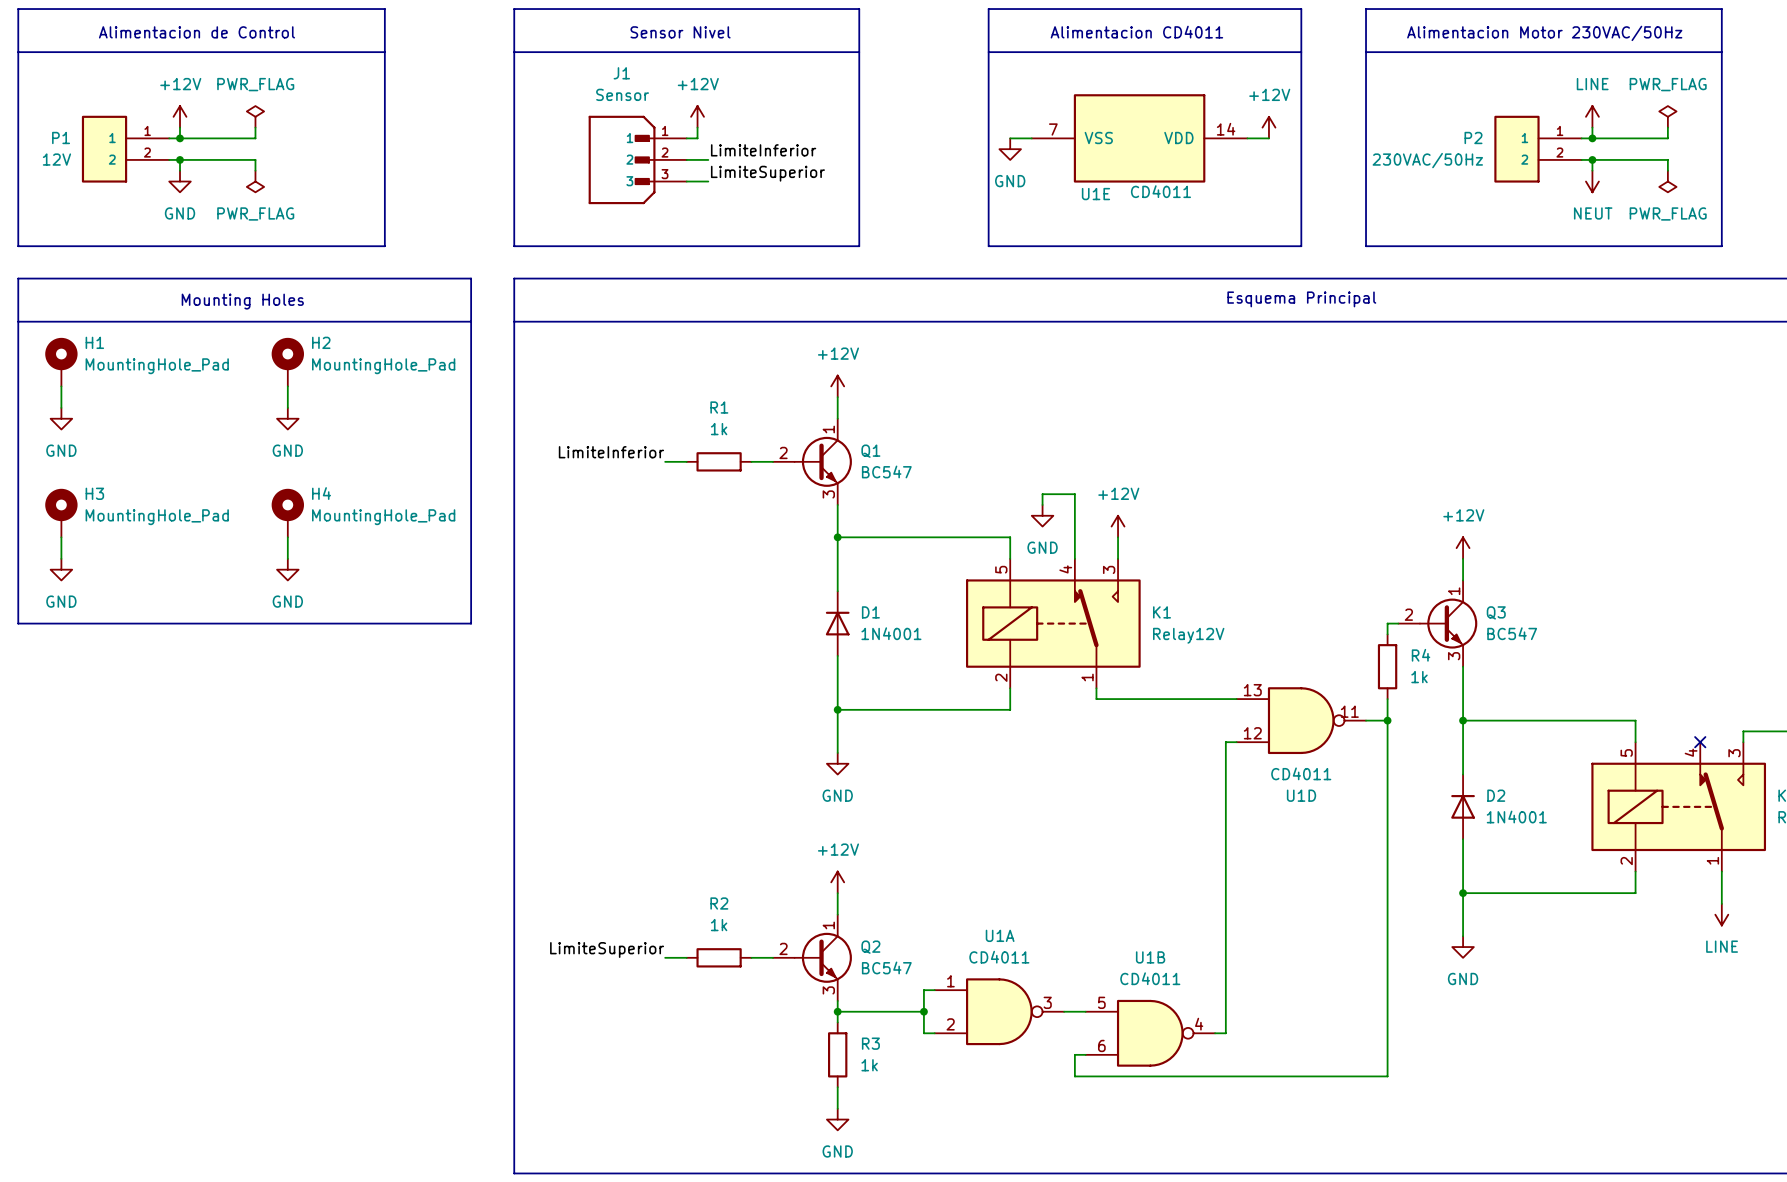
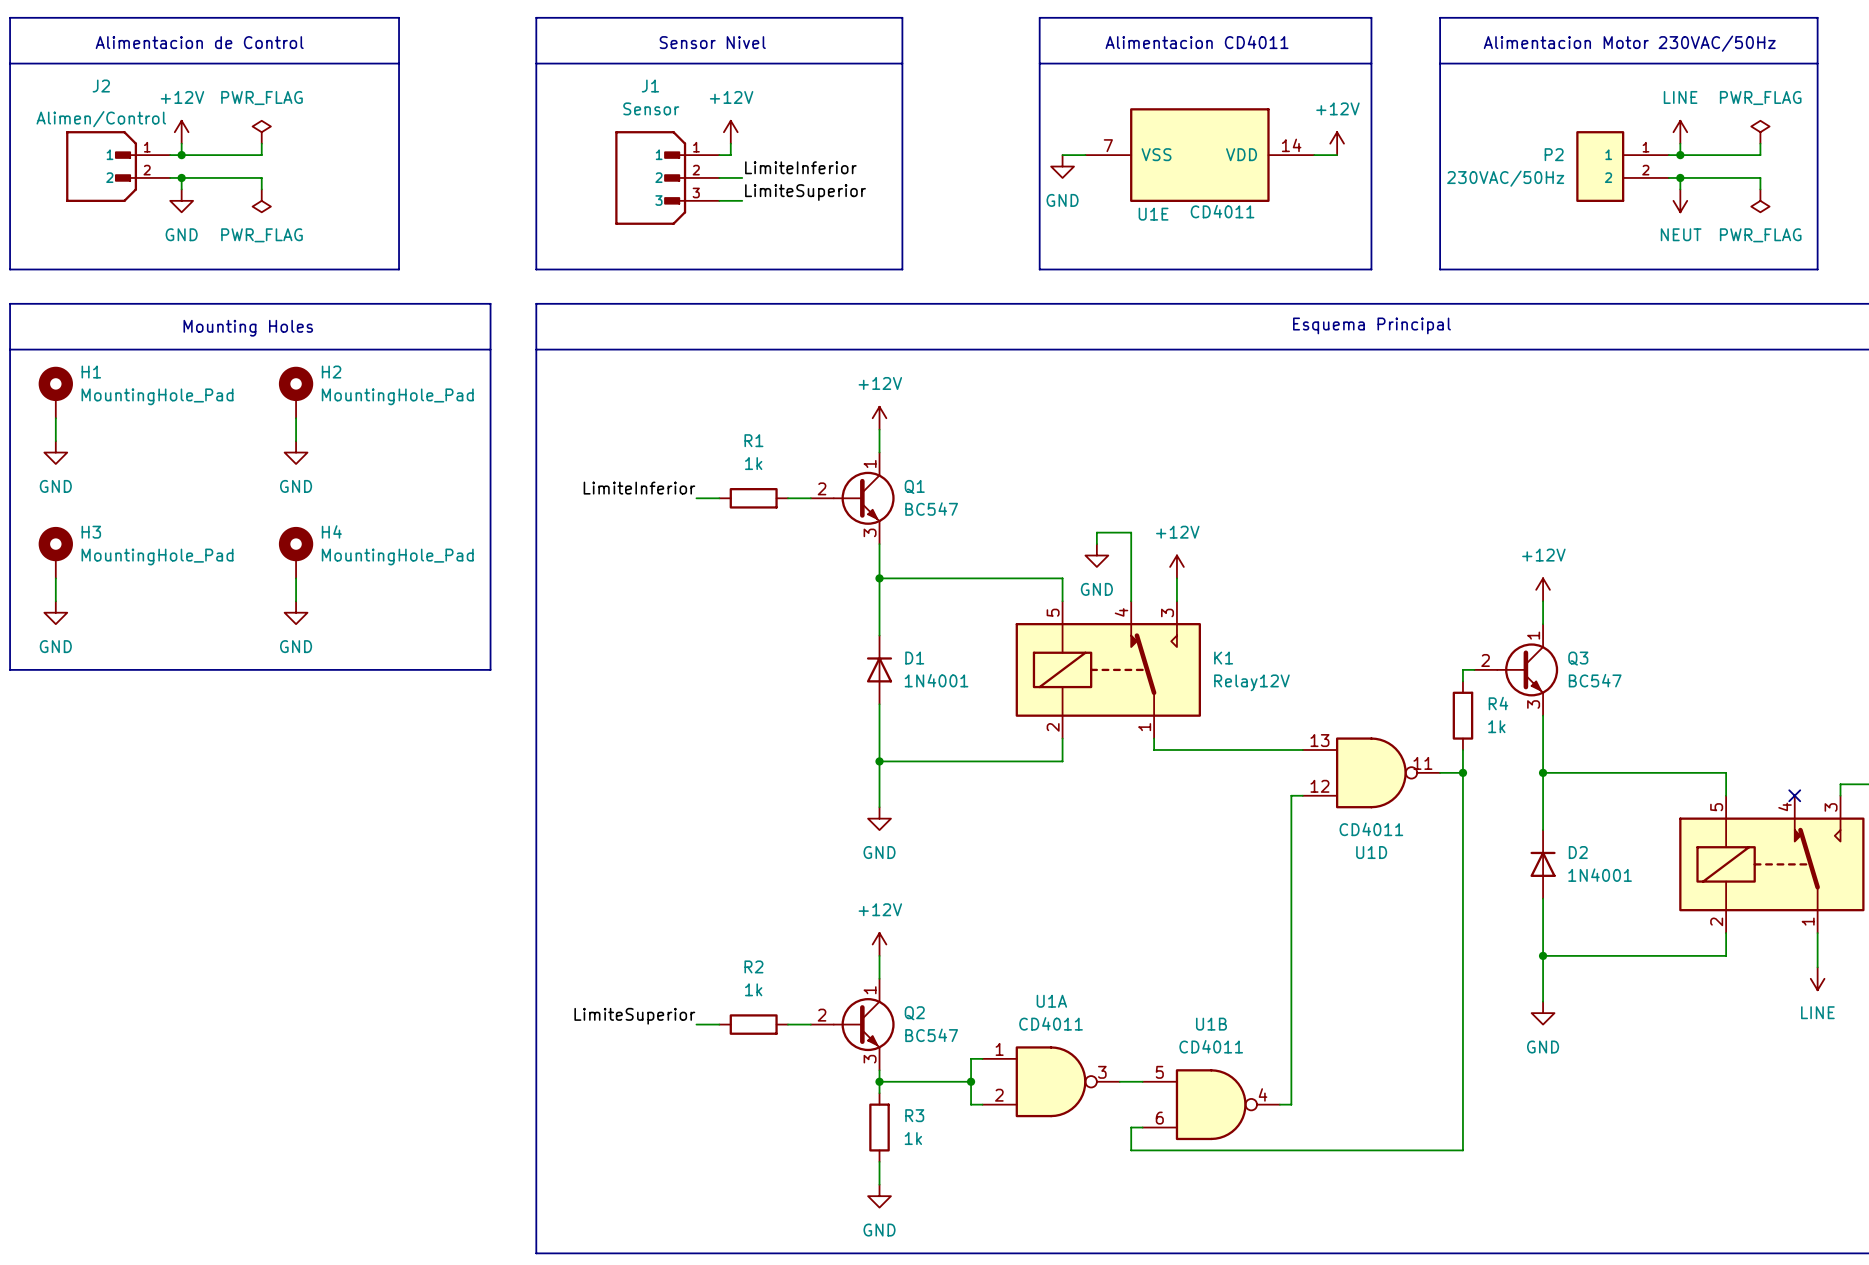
J2: none -> Alimen/Control (118, 166)
P1: 12V (125, 149) -> none

